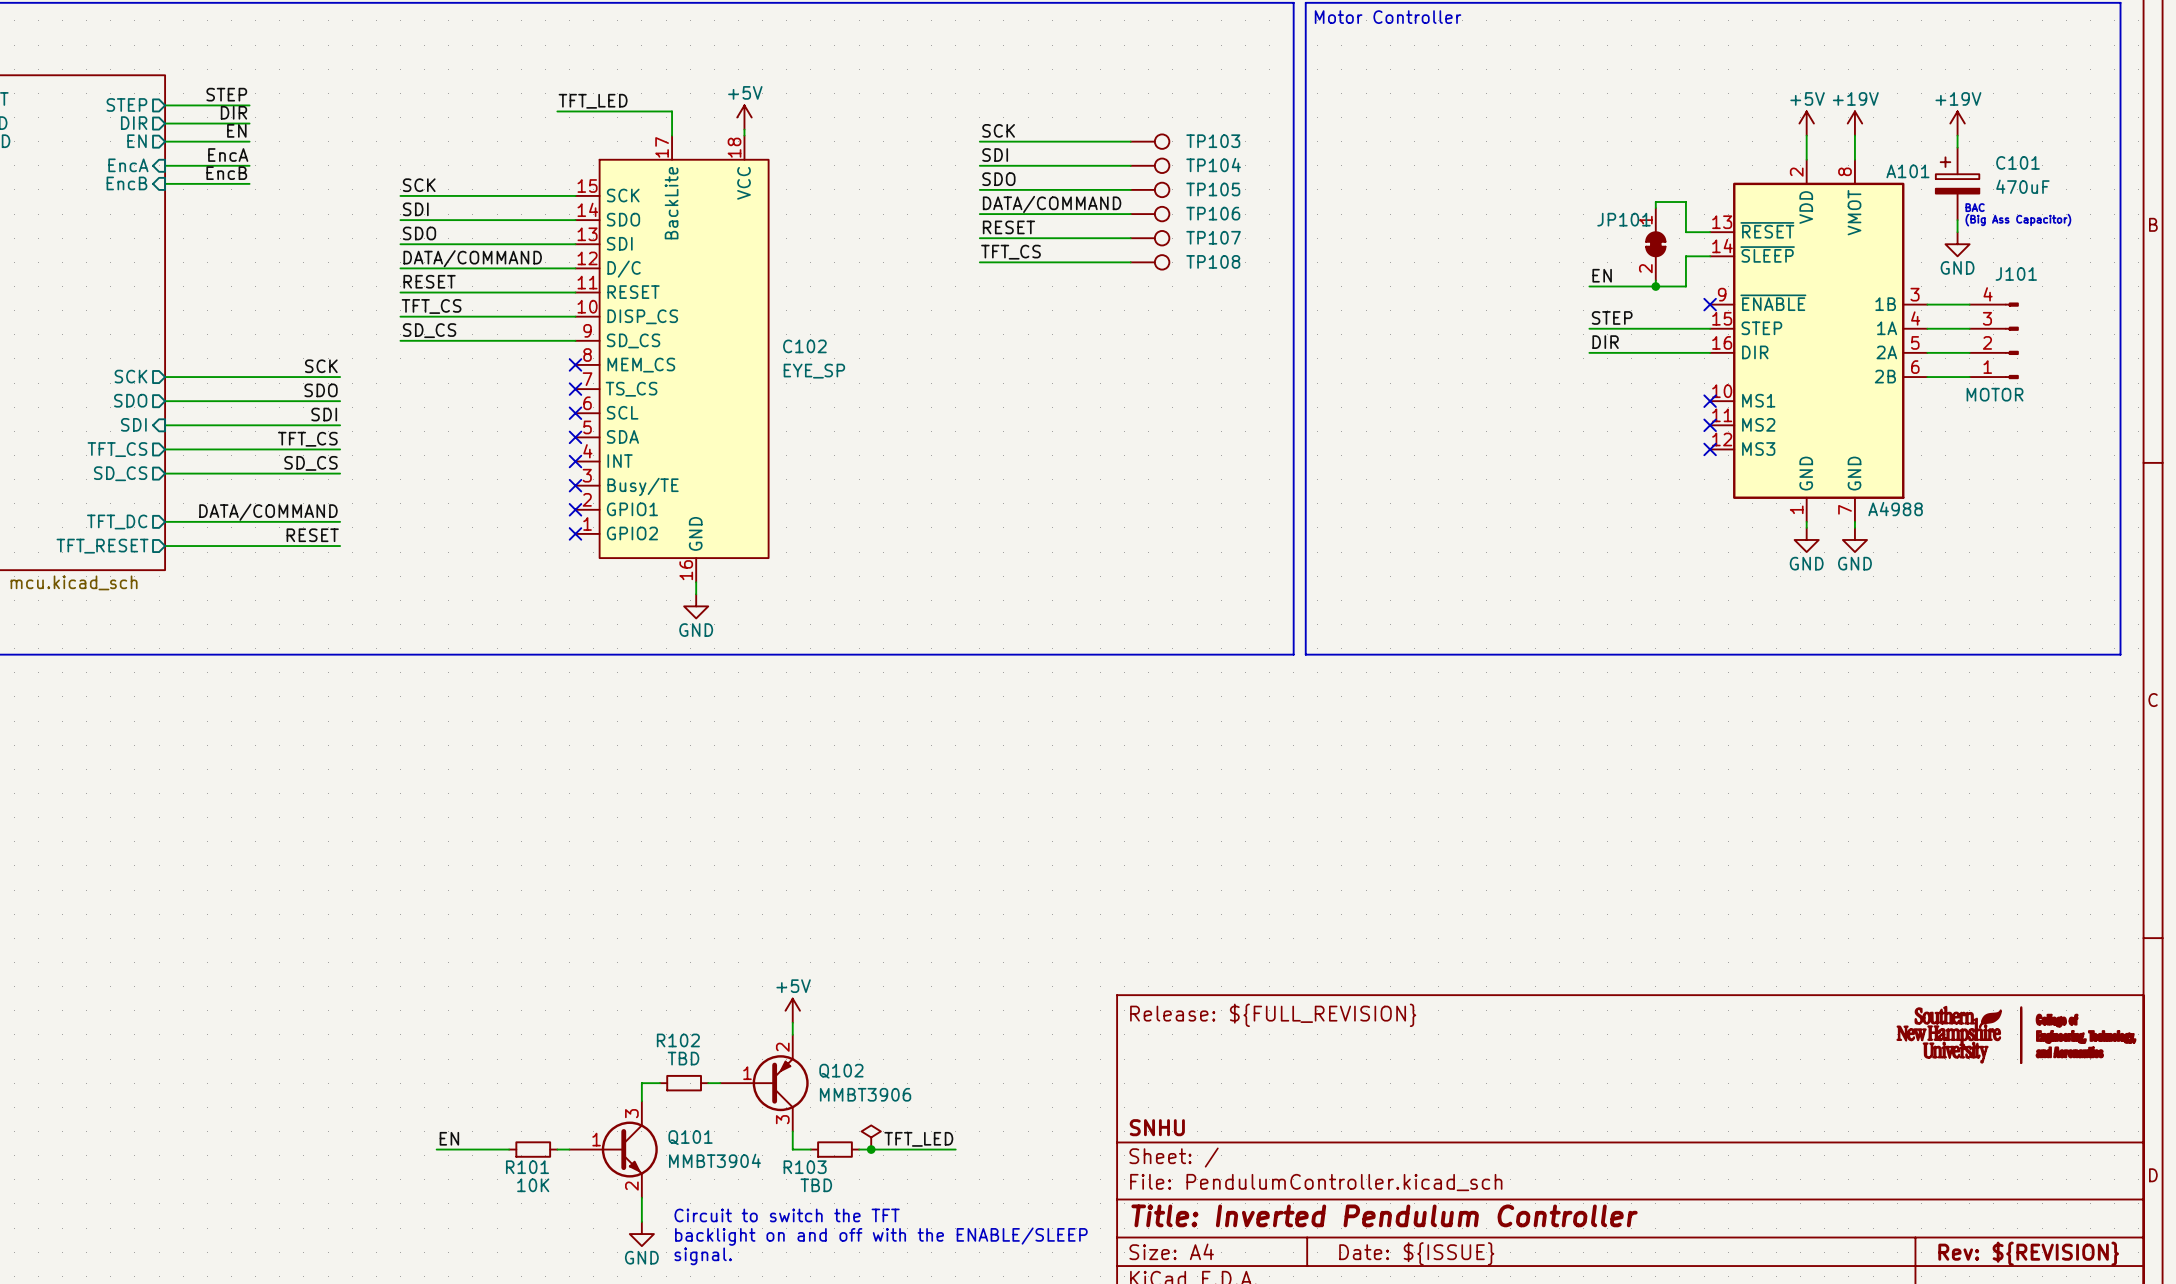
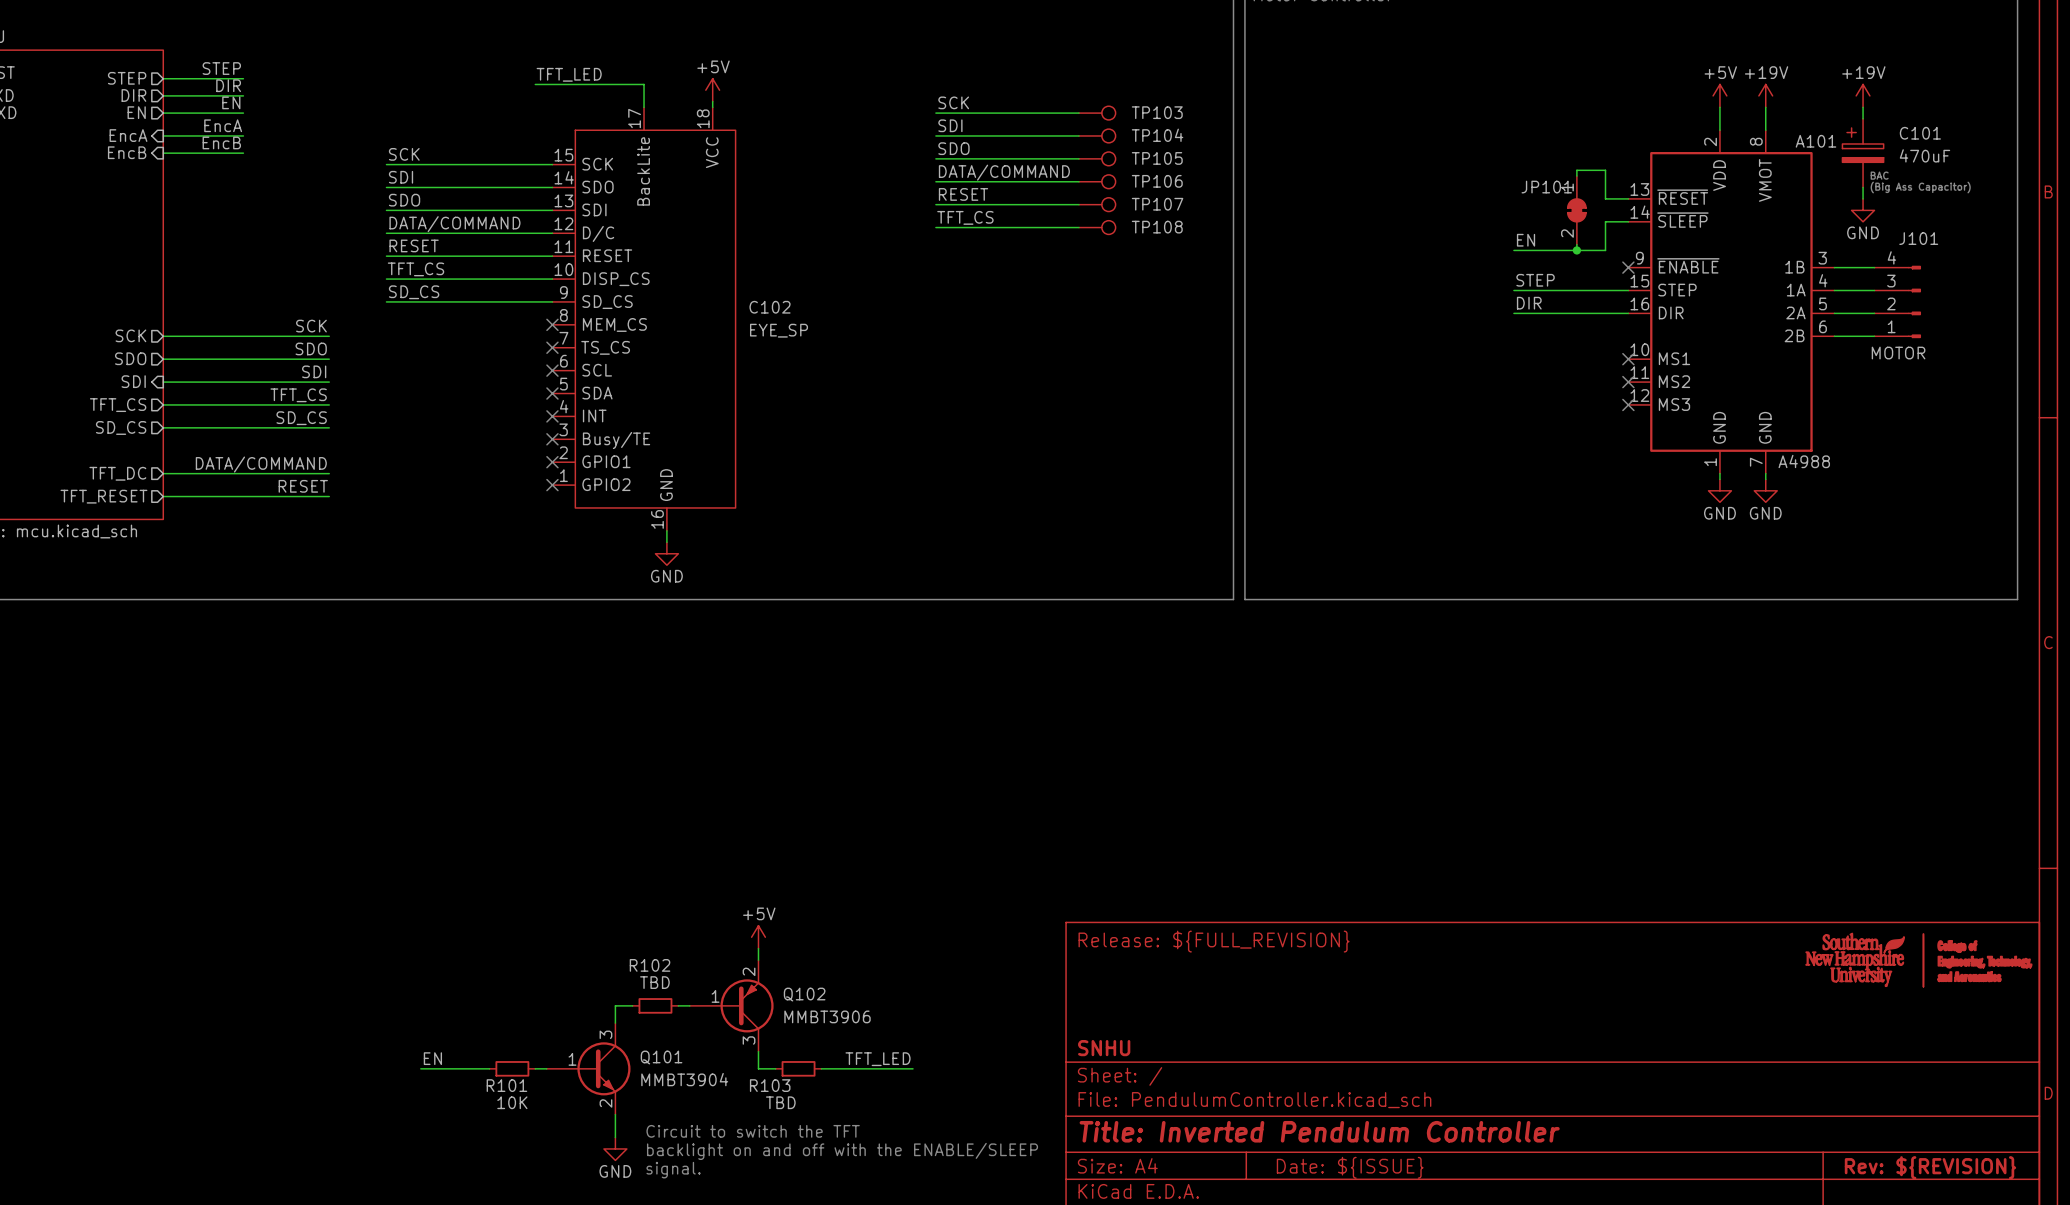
power symbol: (871, 1137) -> none
junction: (871, 1149) -> none

